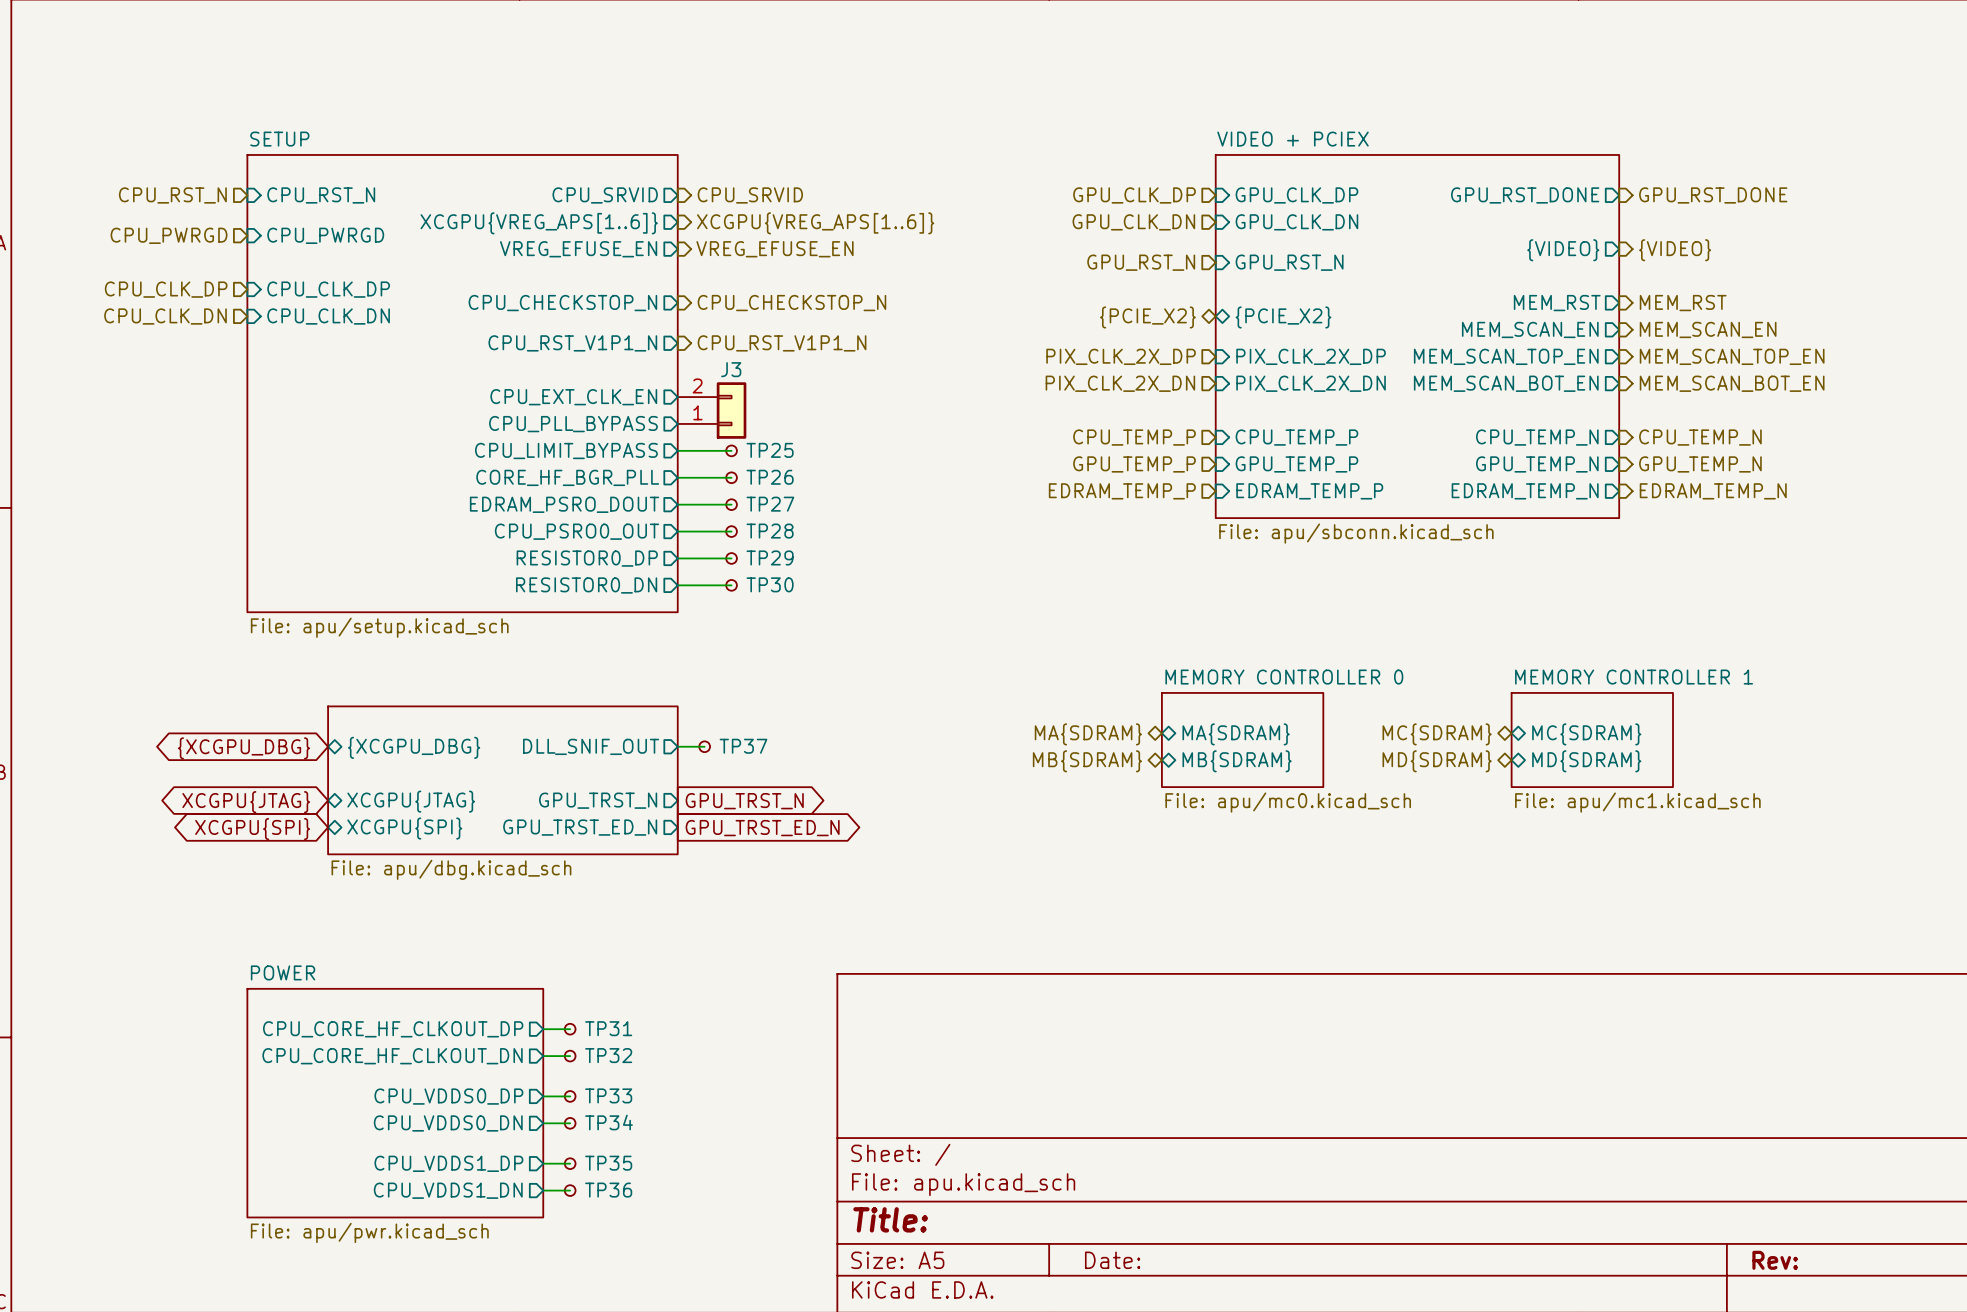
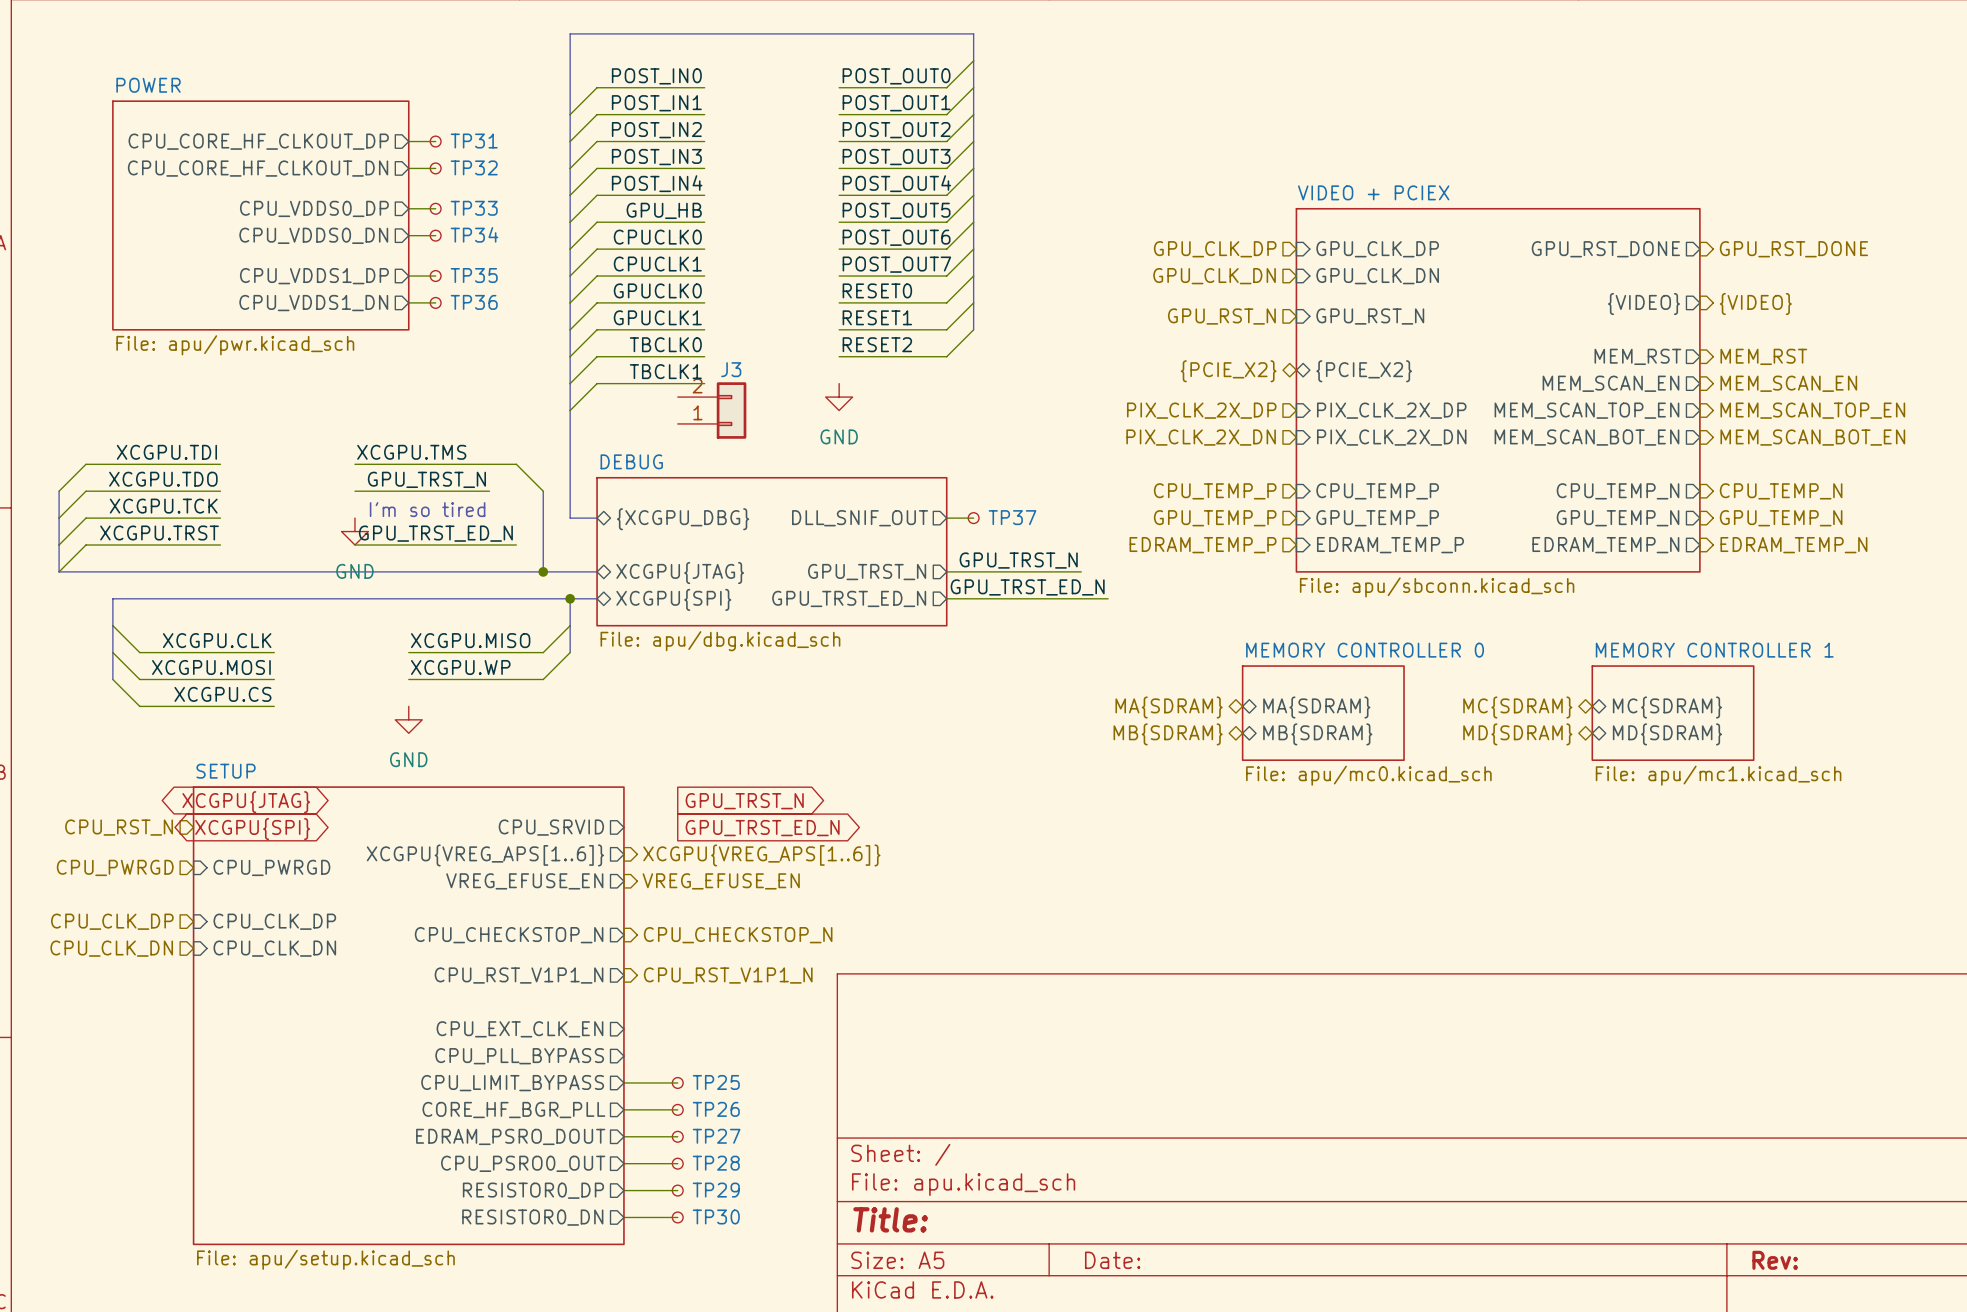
wire: none -> (973, 60) (946, 87) (839, 87)
label: none -> POST_IN0 (656, 76)
label: none -> POST_OUT0 (896, 76)
wire: none -> (704, 87) (597, 87) (570, 114)
wire: none -> (973, 87) (946, 114) (839, 114)
label: none -> POST_IN1 (656, 103)
label: none -> POST_OUT1 (896, 103)
wire: none -> (704, 114) (597, 114) (570, 141)
wire: none -> (973, 114) (946, 141) (839, 141)
label: none -> POST_IN2 (656, 130)
label: none -> POST_OUT2 (896, 130)
sheet pin: none -> CPU_CORE_HF_CLKOUT_DP (258, 141)
wire: none -> (408, 141) (435, 141)
wire: none -> (704, 141) (597, 141) (570, 168)
wire: none -> (973, 141) (946, 168) (839, 168)
label: none -> POST_IN3 (656, 157)
label: none -> POST_OUT3 (896, 157)
sheet pin: none -> CPU_CORE_HF_CLKOUT_DN (258, 168)
wire: none -> (408, 168) (435, 168)
wire: none -> (704, 168) (597, 168) (570, 195)
wire: none -> (973, 168) (946, 195) (839, 195)
label: none -> POST_IN4 (657, 183)
label: none -> POST_OUT4 (896, 183)
hierarchical label: CPU_RST_N (172, 195) -> none
sheet pin: CPU_RST_N (321, 195) -> none
sheet pin: CPU_SRVID (605, 195) -> none
wire: none -> (704, 195) (597, 195) (570, 222)
hierarchical label: CPU_SRVID (750, 195) -> none
wire: none -> (973, 195) (946, 222) (839, 222)
hierarchical label position: GPU_CLK_DP (1134, 195) -> GPU_CLK_DP (1215, 249)
sheet pin position: GPU_CLK_DP (1296, 195) -> GPU_CLK_DP (1377, 249)
sheet pin position: GPU_RST_DONE (1525, 195) -> GPU_RST_DONE (1605, 249)
hierarchical label position: GPU_RST_DONE (1713, 195) -> GPU_RST_DONE (1793, 249)
sheet pin: none -> CPU_VDDS0_DP (314, 208)
wire: none -> (408, 208) (435, 208)
label: none -> GPU_HB (664, 210)
label: none -> POST_OUT5 (896, 210)
sheet POWER: none -> File: apu/pwr.kicad_sch (260, 215)
wire: none -> (704, 222) (597, 222) (570, 249)
wire: none -> (973, 222) (946, 249) (839, 249)
hierarchical label position: GPU_CLK_DN (1133, 222) -> GPU_CLK_DN (1214, 276)
sheet pin position: GPU_CLK_DN (1296, 222) -> GPU_CLK_DN (1377, 276)
sheet pin: XCGPU{VREG_APS[1..6]} (539, 223) -> none
hierarchical label: XCGPU{VREG_APS[1..6]} (815, 223) -> none
hierarchical label: CPU_PWRGD (169, 235) -> none
sheet pin: none -> CPU_VDDS0_DN (313, 235)
sheet pin: CPU_PWRGD (325, 235) -> none
wire: none -> (408, 235) (435, 235)
label: none -> CPUCLK0 (657, 237)
label: none -> POST_OUT6 (896, 237)
sheet pin: VREG_EFUSE_EN (578, 249) -> none
wire: none -> (704, 249) (597, 249) (570, 276)
hierarchical label: VREG_EFUSE_EN (774, 249) -> none
wire: none -> (973, 249) (946, 276) (839, 276)
sheet pin position: {VIDEO} (1563, 250) -> {VIDEO} (1643, 304)
hierarchical label position: {VIDEO} (1675, 250) -> {VIDEO} (1755, 304)
hierarchical label position: GPU_RST_N (1141, 262) -> GPU_RST_N (1221, 316)
sheet pin position: GPU_RST_N (1289, 262) -> GPU_RST_N (1370, 316)
label: none -> CPUCLK1 (657, 264)
label: none -> POST_OUT7 (896, 264)
wire: none -> (408, 276) (435, 276)
wire: none -> (704, 276) (597, 276) (570, 302)
wire: none -> (973, 276) (946, 302) (839, 302)
hierarchical label: CPU_CLK_DP (166, 289) -> none
sheet pin shape: input (328, 289) -> output (314, 276)
sheet pin: CPU_CLK_DP (328, 289) -> CPU_VDDS1_DP (314, 276)
label: none -> GPUCLK0 (657, 290)
label: none -> RESET0 (877, 290)
wire: none -> (408, 302) (435, 302)
wire: none -> (704, 302) (597, 302) (570, 329)
wire: none -> (973, 302) (946, 329) (839, 329)
sheet pin: CPU_CHECKSTOP_N (562, 303) -> none
hierarchical label: CPU_CHECKSTOP_N (791, 303) -> none
sheet pin position: MEM_RST (1557, 303) -> MEM_RST (1637, 356)
hierarchical label position: MEM_RST (1683, 303) -> MEM_RST (1763, 356)
hierarchical label: CPU_CLK_DN (165, 316) -> none
sheet pin shape: input (328, 316) -> output (313, 303)
sheet pin: CPU_CLK_DN (328, 316) -> CPU_VDDS1_DN (313, 303)
label: none -> GPUCLK1 (657, 317)
label: none -> RESET1 (877, 317)
hierarchical label position: {PCIE_X2} (1147, 317) -> {PCIE_X2} (1228, 371)
sheet pin position: {PCIE_X2} (1283, 317) -> {PCIE_X2} (1364, 371)
wire: none -> (704, 329) (597, 329) (570, 356)
wire: none -> (973, 329) (946, 356) (839, 356)
bus: none -> (973, 329) (973, 33) (570, 33) (570, 518) (597, 518)
sheet pin position: MEM_SCAN_EN (1530, 329) -> MEM_SCAN_EN (1610, 383)
hierarchical label position: MEM_SCAN_EN (1708, 329) -> MEM_SCAN_EN (1788, 383)
sheet VIDEO + PCIEX position: (1417, 336) -> (1498, 390)
sheet pin: CPU_RST_V1P1_N (572, 343) -> none
hierarchical label: CPU_RST_V1P1_N (782, 343) -> none
label: none -> TBCLK0 (665, 344)
label: none -> RESET2 (877, 344)
wire: none -> (704, 356) (597, 356) (570, 383)
hierarchical label position: PIX_CLK_2X_DP (1121, 356) -> PIX_CLK_2X_DP (1201, 410)
sheet pin position: PIX_CLK_2X_DP (1311, 356) -> PIX_CLK_2X_DP (1391, 410)
sheet pin position: MEM_SCAN_TOP_EN (1506, 356) -> MEM_SCAN_TOP_EN (1586, 410)
hierarchical label position: MEM_SCAN_TOP_EN (1732, 356) -> MEM_SCAN_TOP_EN (1812, 410)
label: none -> TBCLK1 (665, 371)
sheet SETUP: File: apu/setup.kicad_sch (462, 383) -> none
wire: none -> (704, 383) (597, 383) (570, 410)
hierarchical label position: PIX_CLK_2X_DN (1120, 383) -> PIX_CLK_2X_DN (1201, 437)
sheet pin position: PIX_CLK_2X_DN (1311, 383) -> PIX_CLK_2X_DN (1391, 437)
sheet pin position: MEM_SCAN_BOT_EN (1506, 383) -> MEM_SCAN_BOT_EN (1586, 437)
hierarchical label position: MEM_SCAN_BOT_EN (1732, 383) -> MEM_SCAN_BOT_EN (1812, 437)
sheet pin: CPU_EXT_CLK_EN (573, 397) -> none
power symbol: none -> GND (839, 397)
sheet pin: CPU_PLL_BYPASS (573, 424) -> none
hierarchical label position: CPU_TEMP_P (1134, 437) -> CPU_TEMP_P (1215, 491)
sheet pin position: CPU_TEMP_P (1296, 437) -> CPU_TEMP_P (1377, 491)
sheet pin position: CPU_TEMP_N (1537, 437) -> CPU_TEMP_N (1618, 491)
hierarchical label position: CPU_TEMP_N (1700, 437) -> CPU_TEMP_N (1781, 491)
wire: (677, 450) (731, 450) -> none
TP25 position: (731, 450) -> (677, 1082)
sheet pin: CPU_LIMIT_BYPASS (566, 451) -> none
label: none -> XCGPU.TDI (166, 452)
label: none -> XCGPU.TMS (411, 452)
wire: none -> (220, 464) (85, 464) (59, 491)
wire: none -> (354, 464) (516, 464) (543, 491)
hierarchical label position: GPU_TEMP_P (1134, 464) -> GPU_TEMP_P (1215, 518)
sheet pin position: GPU_TEMP_P (1296, 464) -> GPU_TEMP_P (1377, 518)
sheet pin position: GPU_TEMP_N (1537, 464) -> GPU_TEMP_N (1618, 518)
hierarchical label position: GPU_TEMP_N (1700, 464) -> GPU_TEMP_N (1781, 518)
sheet pin: CORE_HF_BGR_PLL (567, 477) -> none
TP26 position: (731, 477) -> (677, 1109)
label: none -> XCGPU.TDO (163, 479)
label: none -> GPU_TRST_N (426, 479)
bus: none -> (59, 491) (59, 571) (597, 571)
wire: none -> (220, 491) (85, 491) (59, 518)
wire: none -> (354, 491) (489, 491)
bus: none -> (543, 491) (543, 571)
hierarchical label position: EDRAM_TEMP_P (1122, 491) -> EDRAM_TEMP_P (1203, 545)
sheet pin position: EDRAM_TEMP_P (1309, 491) -> EDRAM_TEMP_P (1390, 545)
sheet pin position: EDRAM_TEMP_N (1525, 491) -> EDRAM_TEMP_N (1605, 545)
hierarchical label position: EDRAM_TEMP_N (1713, 491) -> EDRAM_TEMP_N (1793, 545)
sheet pin: EDRAM_PSRO_DOUT (564, 504) -> none
wire: (677, 504) (731, 504) -> none
TP27 position: (731, 504) -> (677, 1136)
label: none -> XCGPU.TCK (163, 506)
text: none -> I'm so tired (427, 509)
wire: none -> (220, 518) (85, 518) (59, 545)
sheet pin: none -> DLL_SNIF_OUT (860, 518)
wire: none -> (946, 518) (973, 518)
sheet pin: none -> {XCGPU_DBG} (683, 519)
power symbol: none -> GND (354, 531)
sheet pin: CPU_PSRO0_OUT (576, 531) -> none
wire: (677, 531) (731, 531) -> none
TP28 position: (731, 531) -> (677, 1163)
label: none -> XCGPU.TRST (159, 533)
label: none -> GPU_TRST_ED_N (435, 533)
wire: none -> (220, 545) (85, 545) (59, 571)
wire: none -> (354, 545) (516, 545)
sheet DEBUG: none -> File: apu/dbg.kicad_sch (771, 551)
sheet pin: RESISTOR0_DP (587, 558) -> none
wire: (677, 558) (731, 558) -> none
TP29 position: (731, 558) -> (677, 1190)
label: none -> GPU_TRST_N (1018, 560)
junction: none -> (543, 571)
wire: none -> (946, 571) (1081, 571)
sheet pin: none -> GPU_TRST_N (867, 572)
sheet pin: none -> XCGPU{JTAG} (680, 573)
sheet pin: RESISTOR0_DN (586, 585) -> none
wire: (677, 585) (731, 585) -> none
TP30 position: (731, 585) -> (677, 1217)
label: none -> GPU_TRST_ED_N (1027, 587)
bus: none -> (570, 598) (570, 652)
junction: none -> (570, 598)
bus: none -> (597, 598) (112, 598) (112, 679)
sheet pin: none -> GPU_TRST_ED_N (849, 598)
wire: none -> (946, 598) (1108, 598)
sheet pin: none -> XCGPU{SPI} (673, 599)
wire: none -> (112, 625) (139, 652) (274, 652)
wire: none -> (570, 625) (543, 652) (408, 652)
label: none -> XCGPU.CLK (217, 640)
label: none -> XCGPU.MISO (470, 640)
wire: none -> (112, 652) (139, 679) (274, 679)
wire: none -> (570, 652) (543, 679) (408, 679)
label: none -> XCGPU.MOSI (211, 667)
label: none -> XCGPU.WP (460, 667)
wire: none -> (112, 679) (139, 706) (274, 706)
label: none -> XCGPU.CS (222, 694)
power symbol: none -> GND (408, 719)
hierarchical label position: MA{SDRAM} (1088, 734) -> MA{SDRAM} (1169, 707)
sheet pin position: MA{SDRAM} (1236, 734) -> MA{SDRAM} (1316, 707)
hierarchical label position: MC{SDRAM} (1437, 734) -> MC{SDRAM} (1517, 707)
sheet pin position: MC{SDRAM} (1586, 734) -> MC{SDRAM} (1667, 707)
sheet MEMORY CONTROLLER 0 position: (1242, 740) -> (1323, 713)
sheet MEMORY CONTROLLER 1 position: (1592, 740) -> (1673, 713)
sheet pin: DLL_SNIF_OUT (591, 746) -> none
wire: (677, 746) (704, 746) -> none
TP37 position: (704, 746) -> (973, 518)
sheet pin: {XCGPU_DBG} (414, 747) -> none
global label: {XCGPU_DBG} (243, 748) -> none
hierarchical label position: MB{SDRAM} (1087, 761) -> MB{SDRAM} (1168, 734)
sheet pin position: MB{SDRAM} (1237, 761) -> MB{SDRAM} (1317, 734)
hierarchical label position: MD{SDRAM} (1437, 761) -> MD{SDRAM} (1517, 734)
sheet pin position: MD{SDRAM} (1586, 761) -> MD{SDRAM} (1667, 734)
sheet: File: apu/dbg.kicad_sch (502, 780) -> none
sheet pin: GPU_TRST_N (598, 800) -> none
sheet pin: XCGPU{JTAG} (411, 801) -> none
hierarchical label: none -> CPU_RST_N (119, 827)
sheet pin: none -> CPU_SRVID (551, 827)
sheet pin: GPU_TRST_ED_N (580, 827) -> none
sheet pin: XCGPU{SPI} (404, 828) -> none
sheet pin: none -> XCGPU{VREG_APS[1..6]} (485, 855)
hierarchical label: none -> XCGPU{VREG_APS[1..6]} (761, 855)
hierarchical label: none -> CPU_PWRGD (115, 867)
sheet pin: none -> CPU_PWRGD (271, 867)
sheet pin: none -> VREG_EFUSE_EN (524, 881)
hierarchical label: none -> VREG_EFUSE_EN (721, 881)
hierarchical label: none -> CPU_CLK_DP (112, 921)
sheet pin: none -> CPU_CLK_DP (274, 921)
sheet pin: none -> CPU_CHECKSTOP_N (509, 935)
hierarchical label: none -> CPU_CHECKSTOP_N (738, 935)
hierarchical label: none -> CPU_CLK_DN (111, 948)
sheet pin: none -> CPU_CLK_DN (274, 948)
sheet pin: none -> CPU_RST_V1P1_N (519, 975)
hierarchical label: none -> CPU_RST_V1P1_N (728, 975)
sheet SETUP: none -> File: apu/setup.kicad_sch (408, 1015)
sheet pin: CPU_CORE_HF_CLKOUT_DP (393, 1029) -> none
wire: (543, 1029) (570, 1029) -> none
TP31 position: (570, 1029) -> (435, 141)
sheet pin: CPU_CORE_HF_CLKOUT_DN (392, 1056) -> CPU_EXT_CLK_EN (519, 1029)
sheet pin: none -> CPU_PLL_BYPASS (519, 1056)
wire: (543, 1056) (570, 1056) -> none
TP32 position: (570, 1056) -> (435, 168)
wire: none -> (623, 1082) (677, 1082)
sheet pin: none -> CPU_LIMIT_BYPASS (512, 1083)
sheet pin: CPU_VDDS0_DP (448, 1096) -> none
wire: (543, 1096) (570, 1096) -> none
TP33 position: (570, 1096) -> (435, 208)
sheet POWER: File: apu/pwr.kicad_sch (395, 1103) -> none
wire: none -> (623, 1109) (677, 1109)
sheet pin: none -> CORE_HF_BGR_PLL (513, 1110)
sheet pin: CPU_VDDS0_DN (448, 1123) -> none
wire: (543, 1123) (570, 1123) -> none
TP34 position: (570, 1123) -> (435, 235)
sheet pin: none -> EDRAM_PSRO_DOUT (510, 1136)
wire: none -> (623, 1136) (677, 1136)
sheet pin: CPU_VDDS1_DP (448, 1163) -> none
sheet pin: none -> CPU_PSRO0_OUT (523, 1163)
wire: (543, 1163) (570, 1163) -> none
TP35 position: (570, 1163) -> (435, 276)
wire: none -> (623, 1163) (677, 1163)
sheet pin: CPU_VDDS1_DN (448, 1190) -> none
sheet pin: none -> RESISTOR0_DP (533, 1190)
wire: (543, 1190) (570, 1190) -> none
TP36 position: (570, 1190) -> (435, 302)
wire: none -> (623, 1190) (677, 1190)
sheet pin: none -> RESISTOR0_DN (532, 1217)
wire: none -> (623, 1217) (677, 1217)

